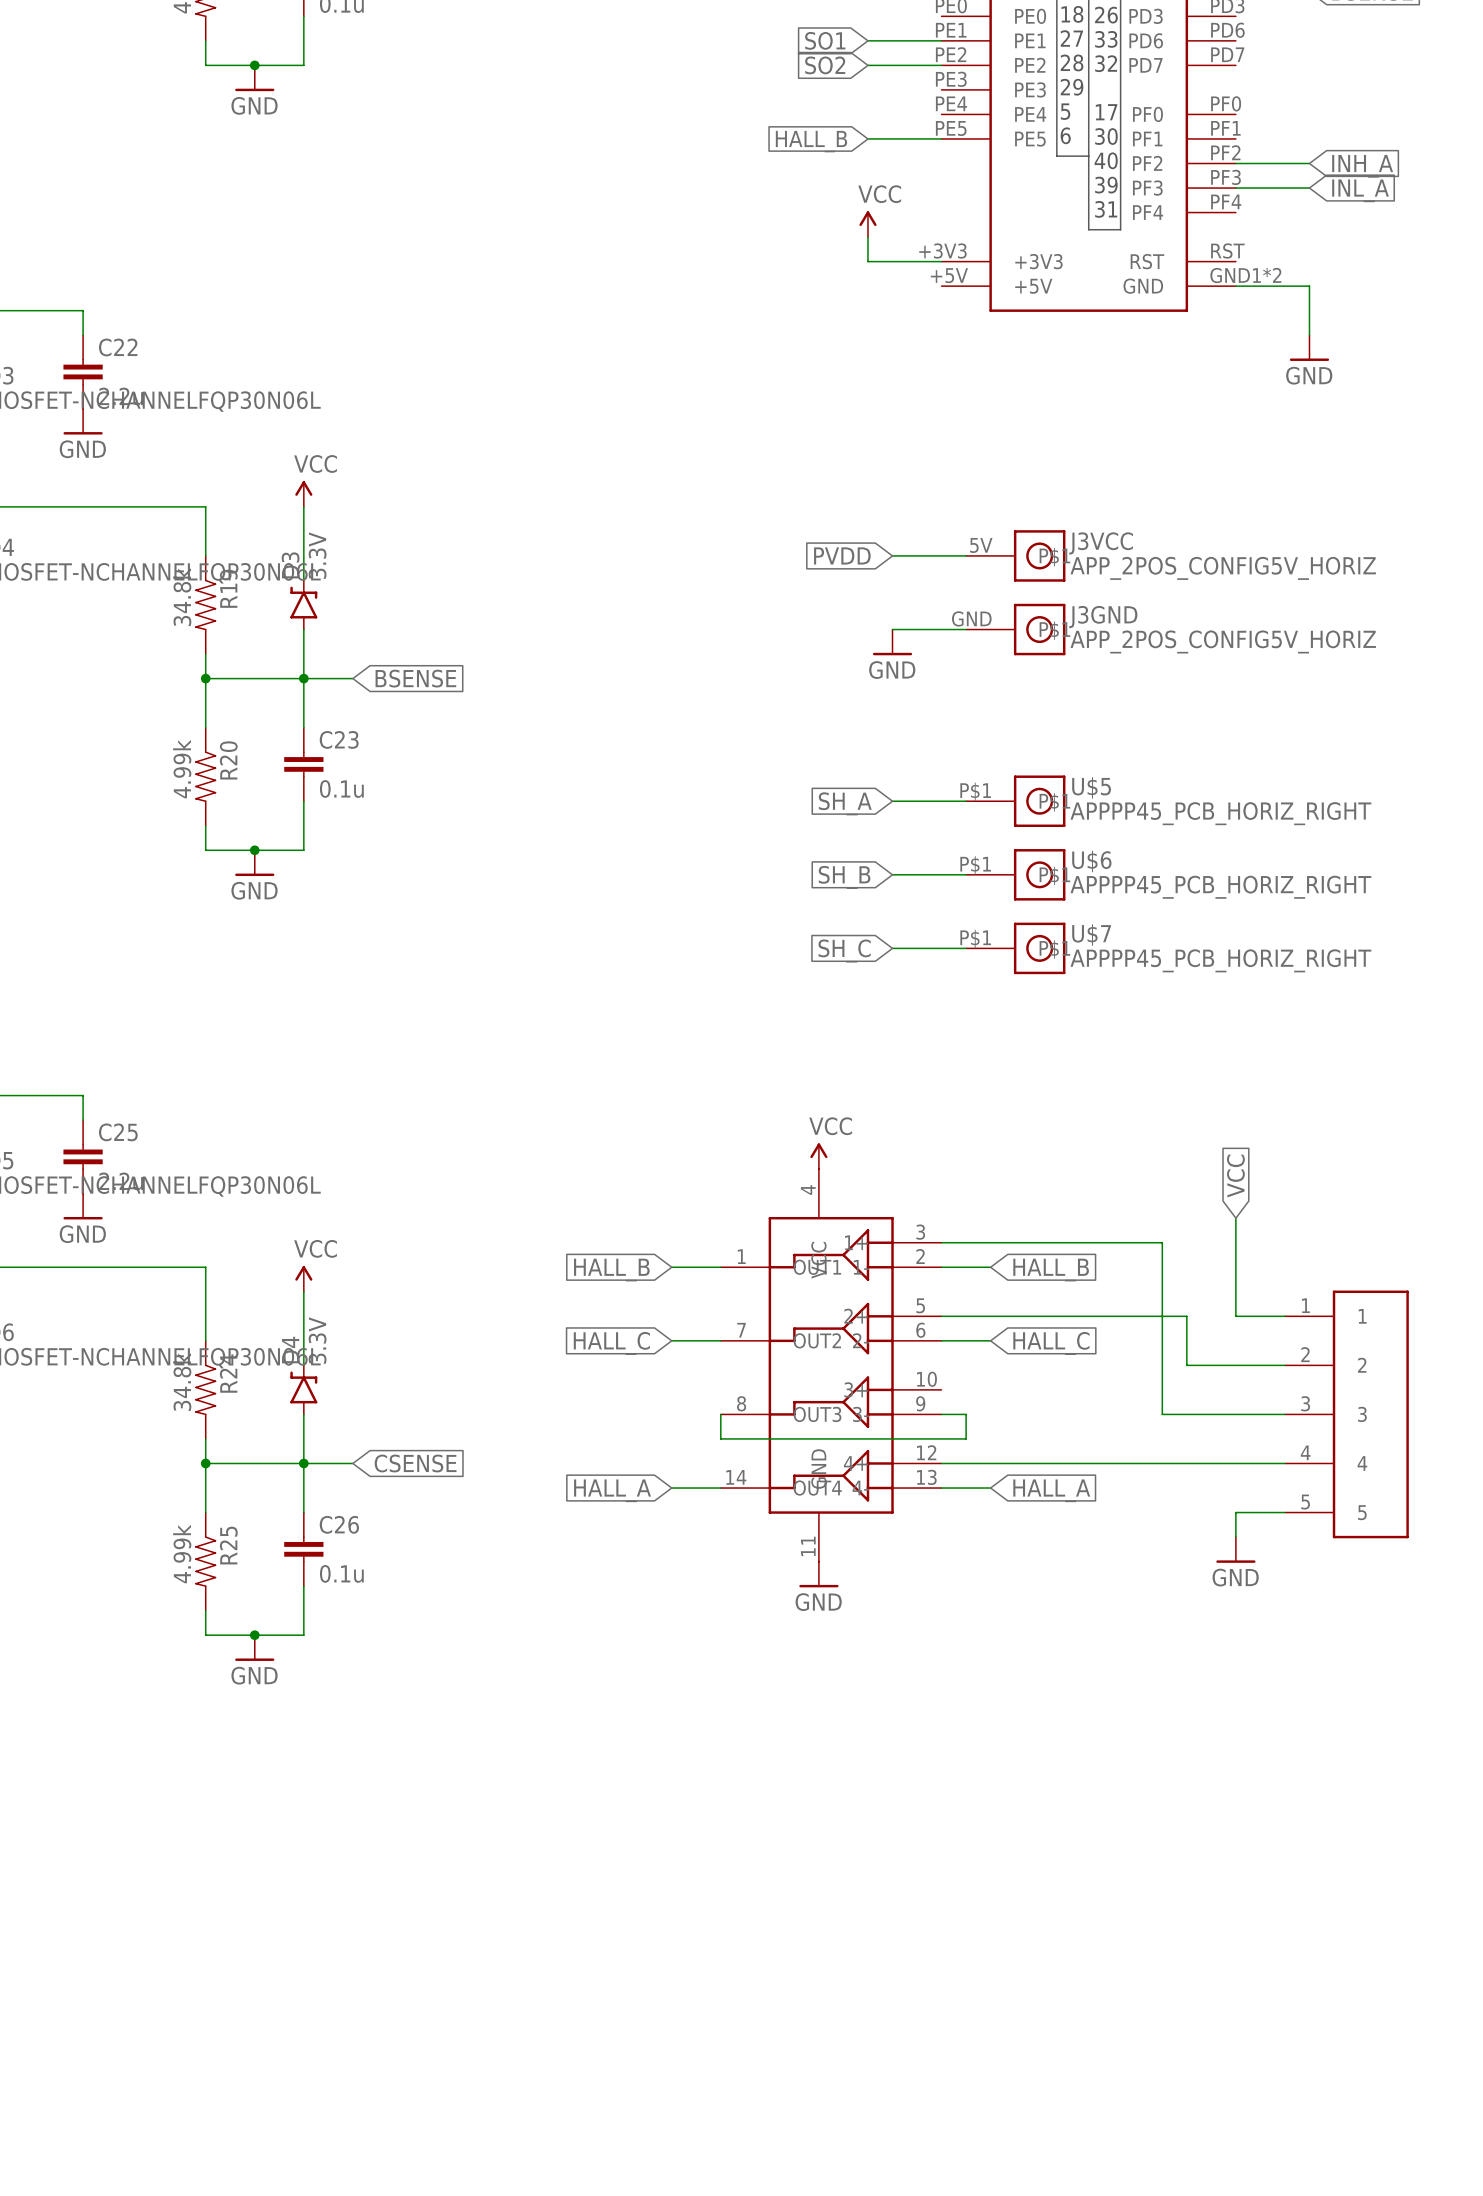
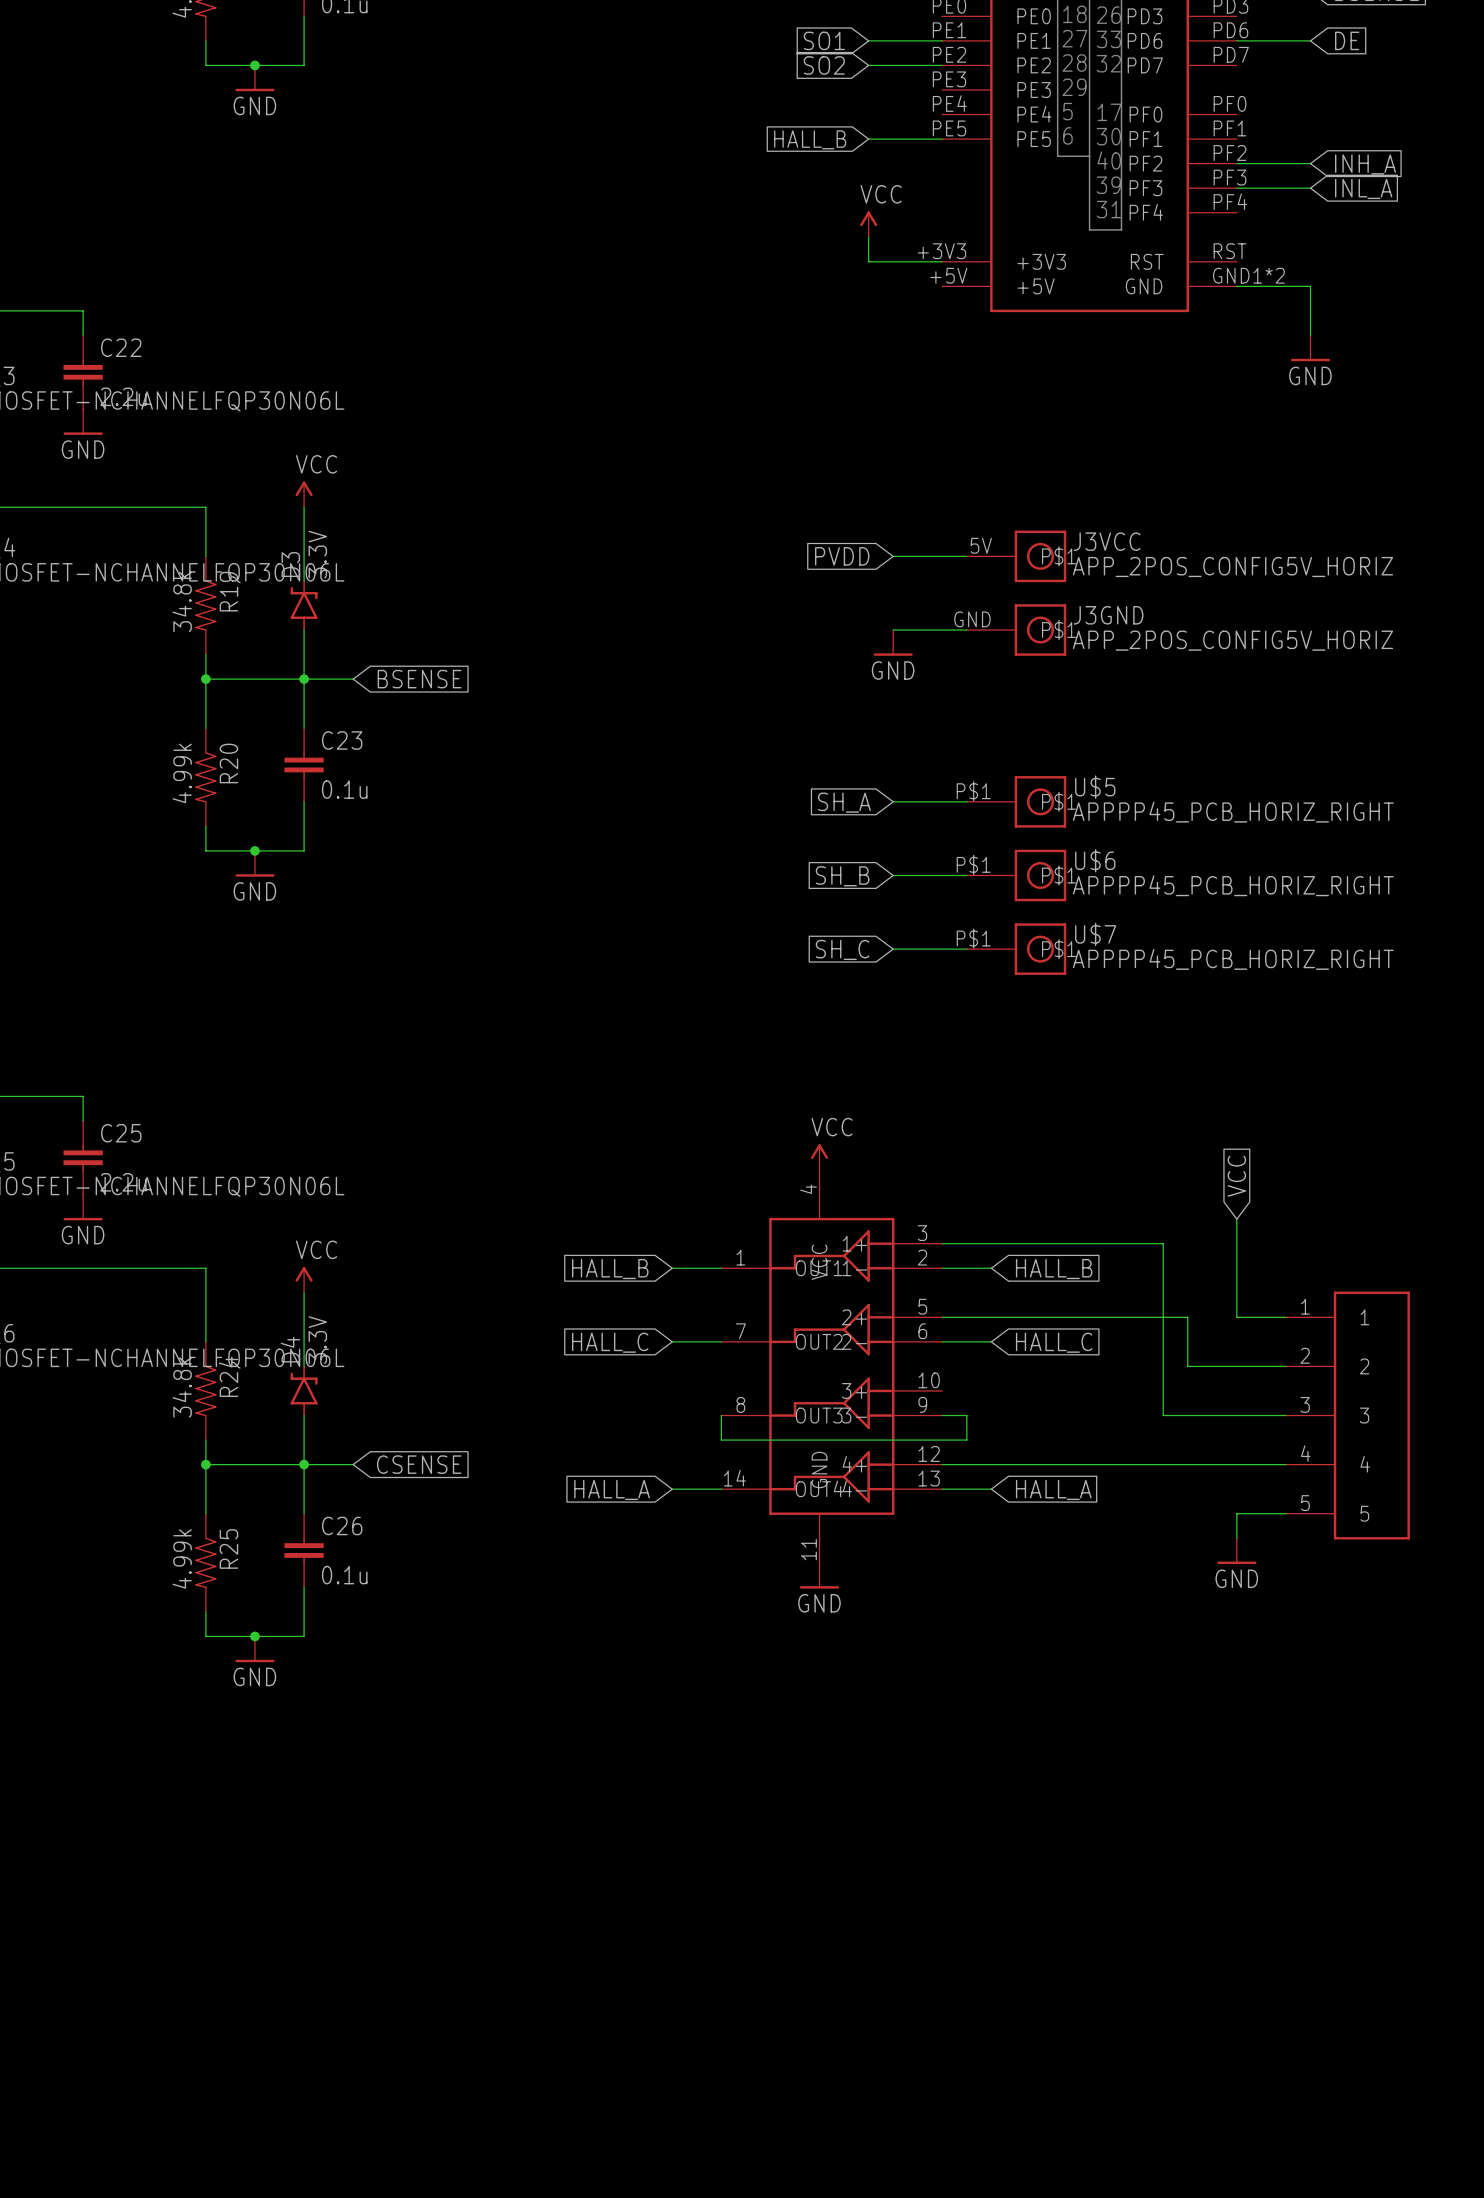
wire: none -> (1236, 40) (1310, 40)
global label: none -> DE (1347, 40)

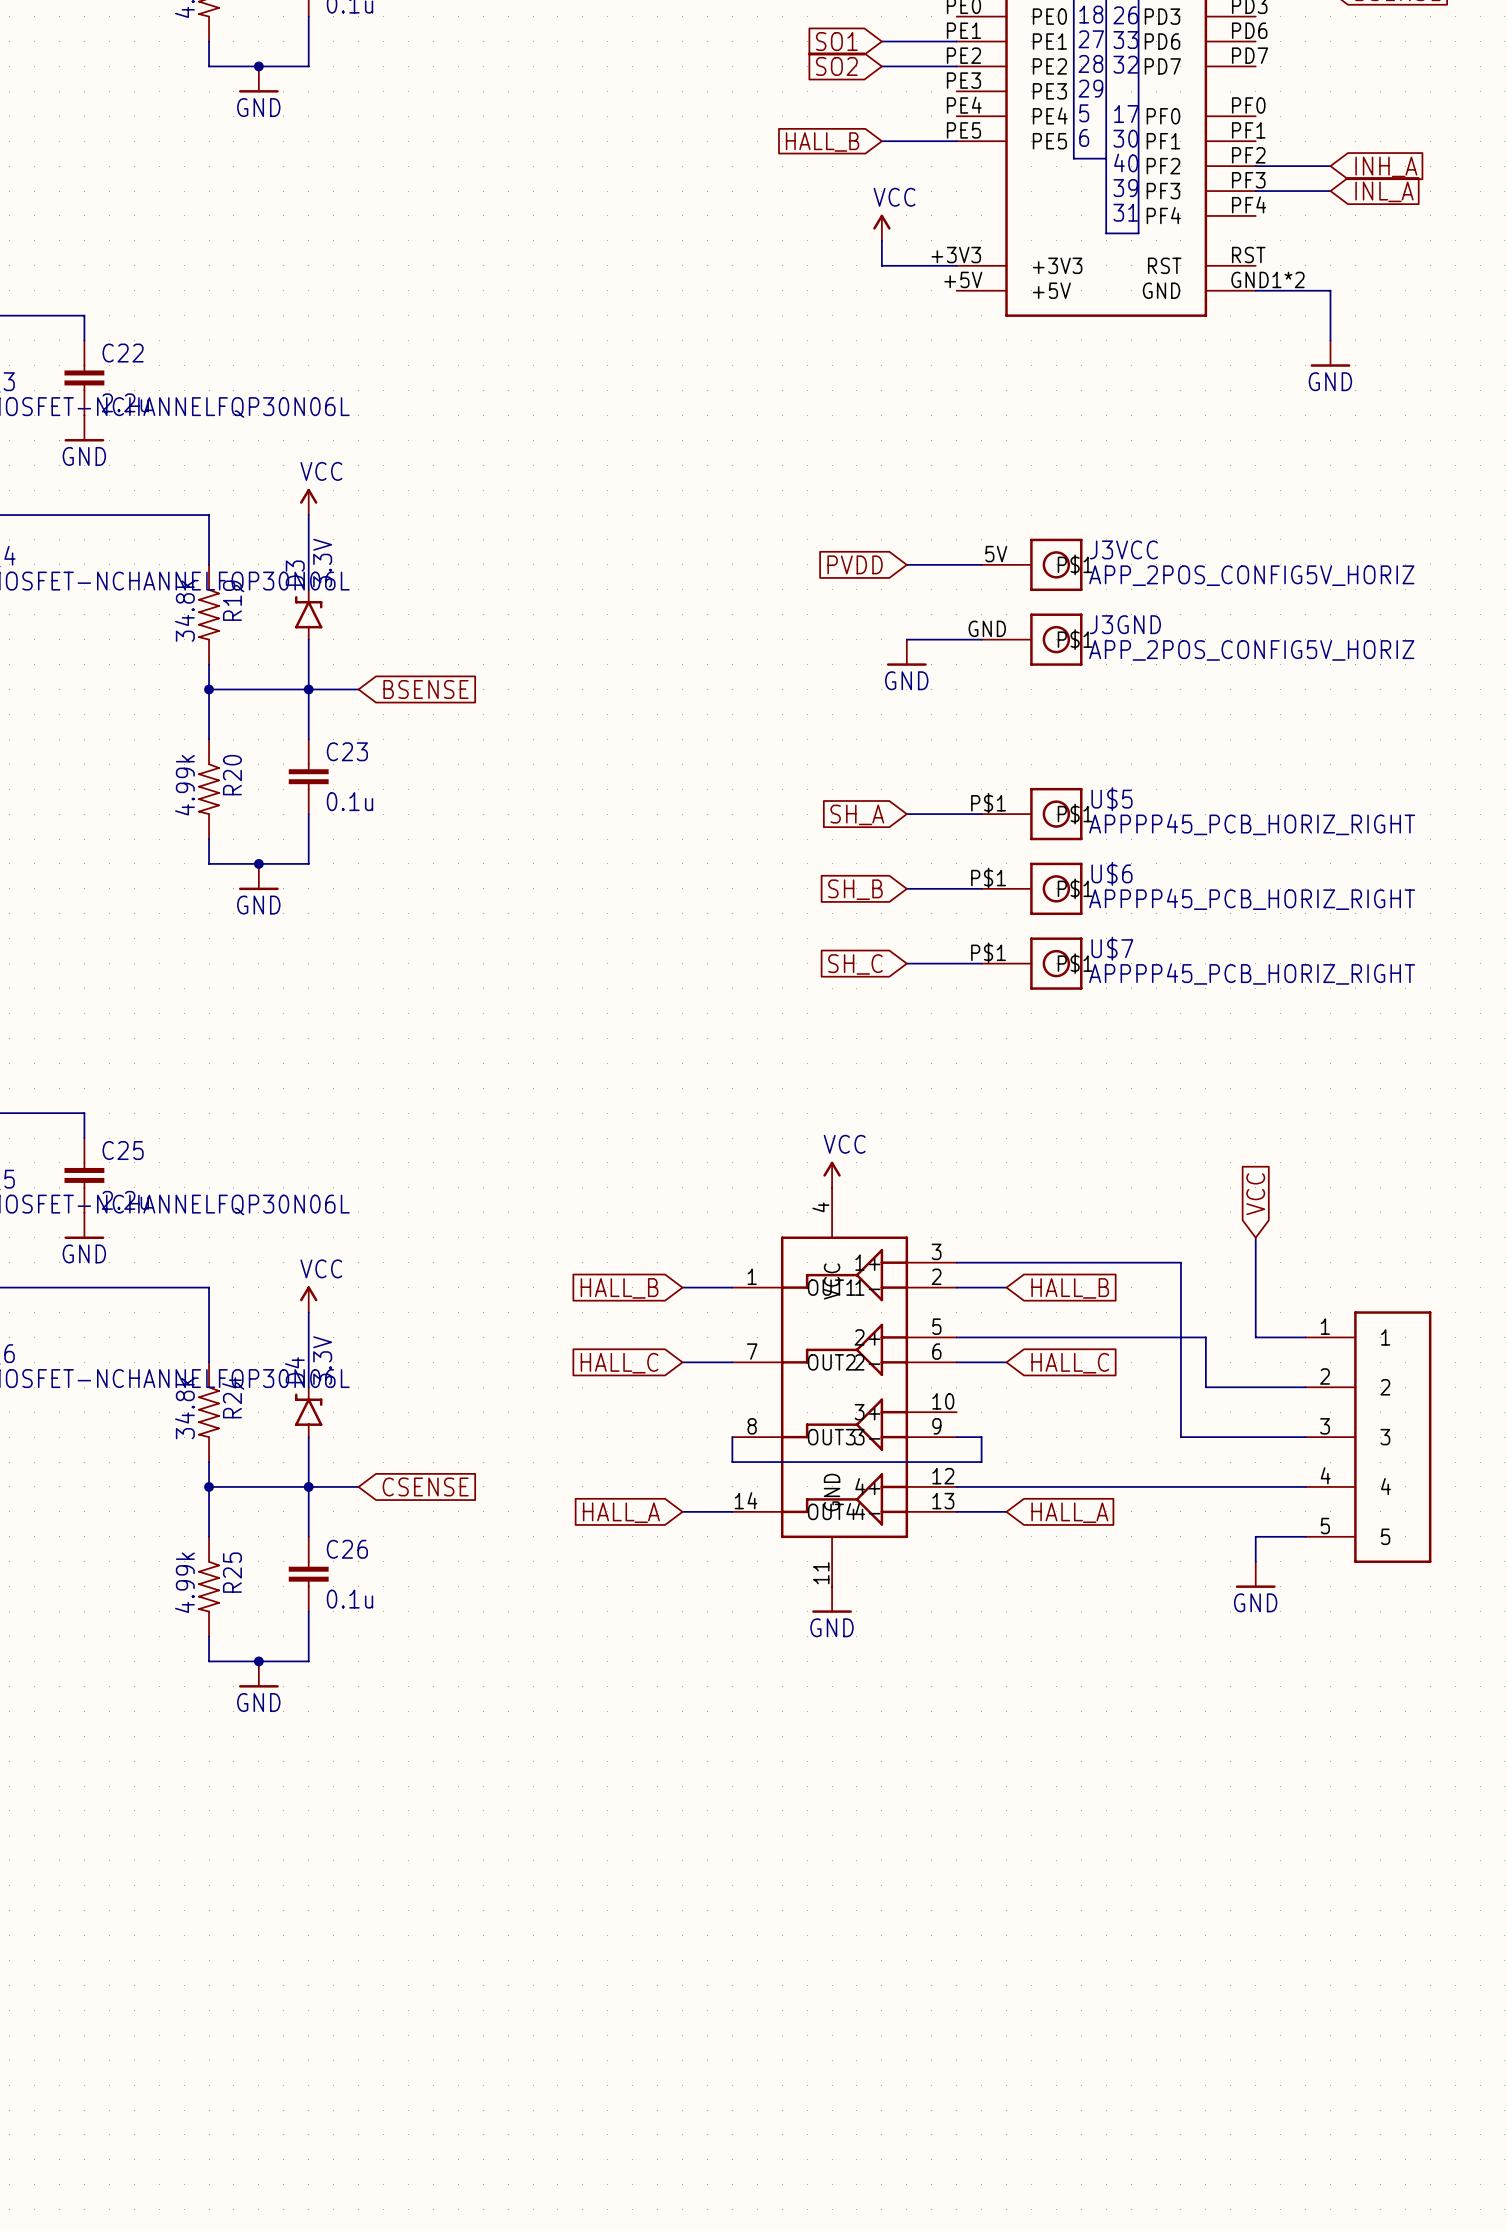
wire: (1236, 40) (1310, 40) -> none
global label: DE (1347, 40) -> none

